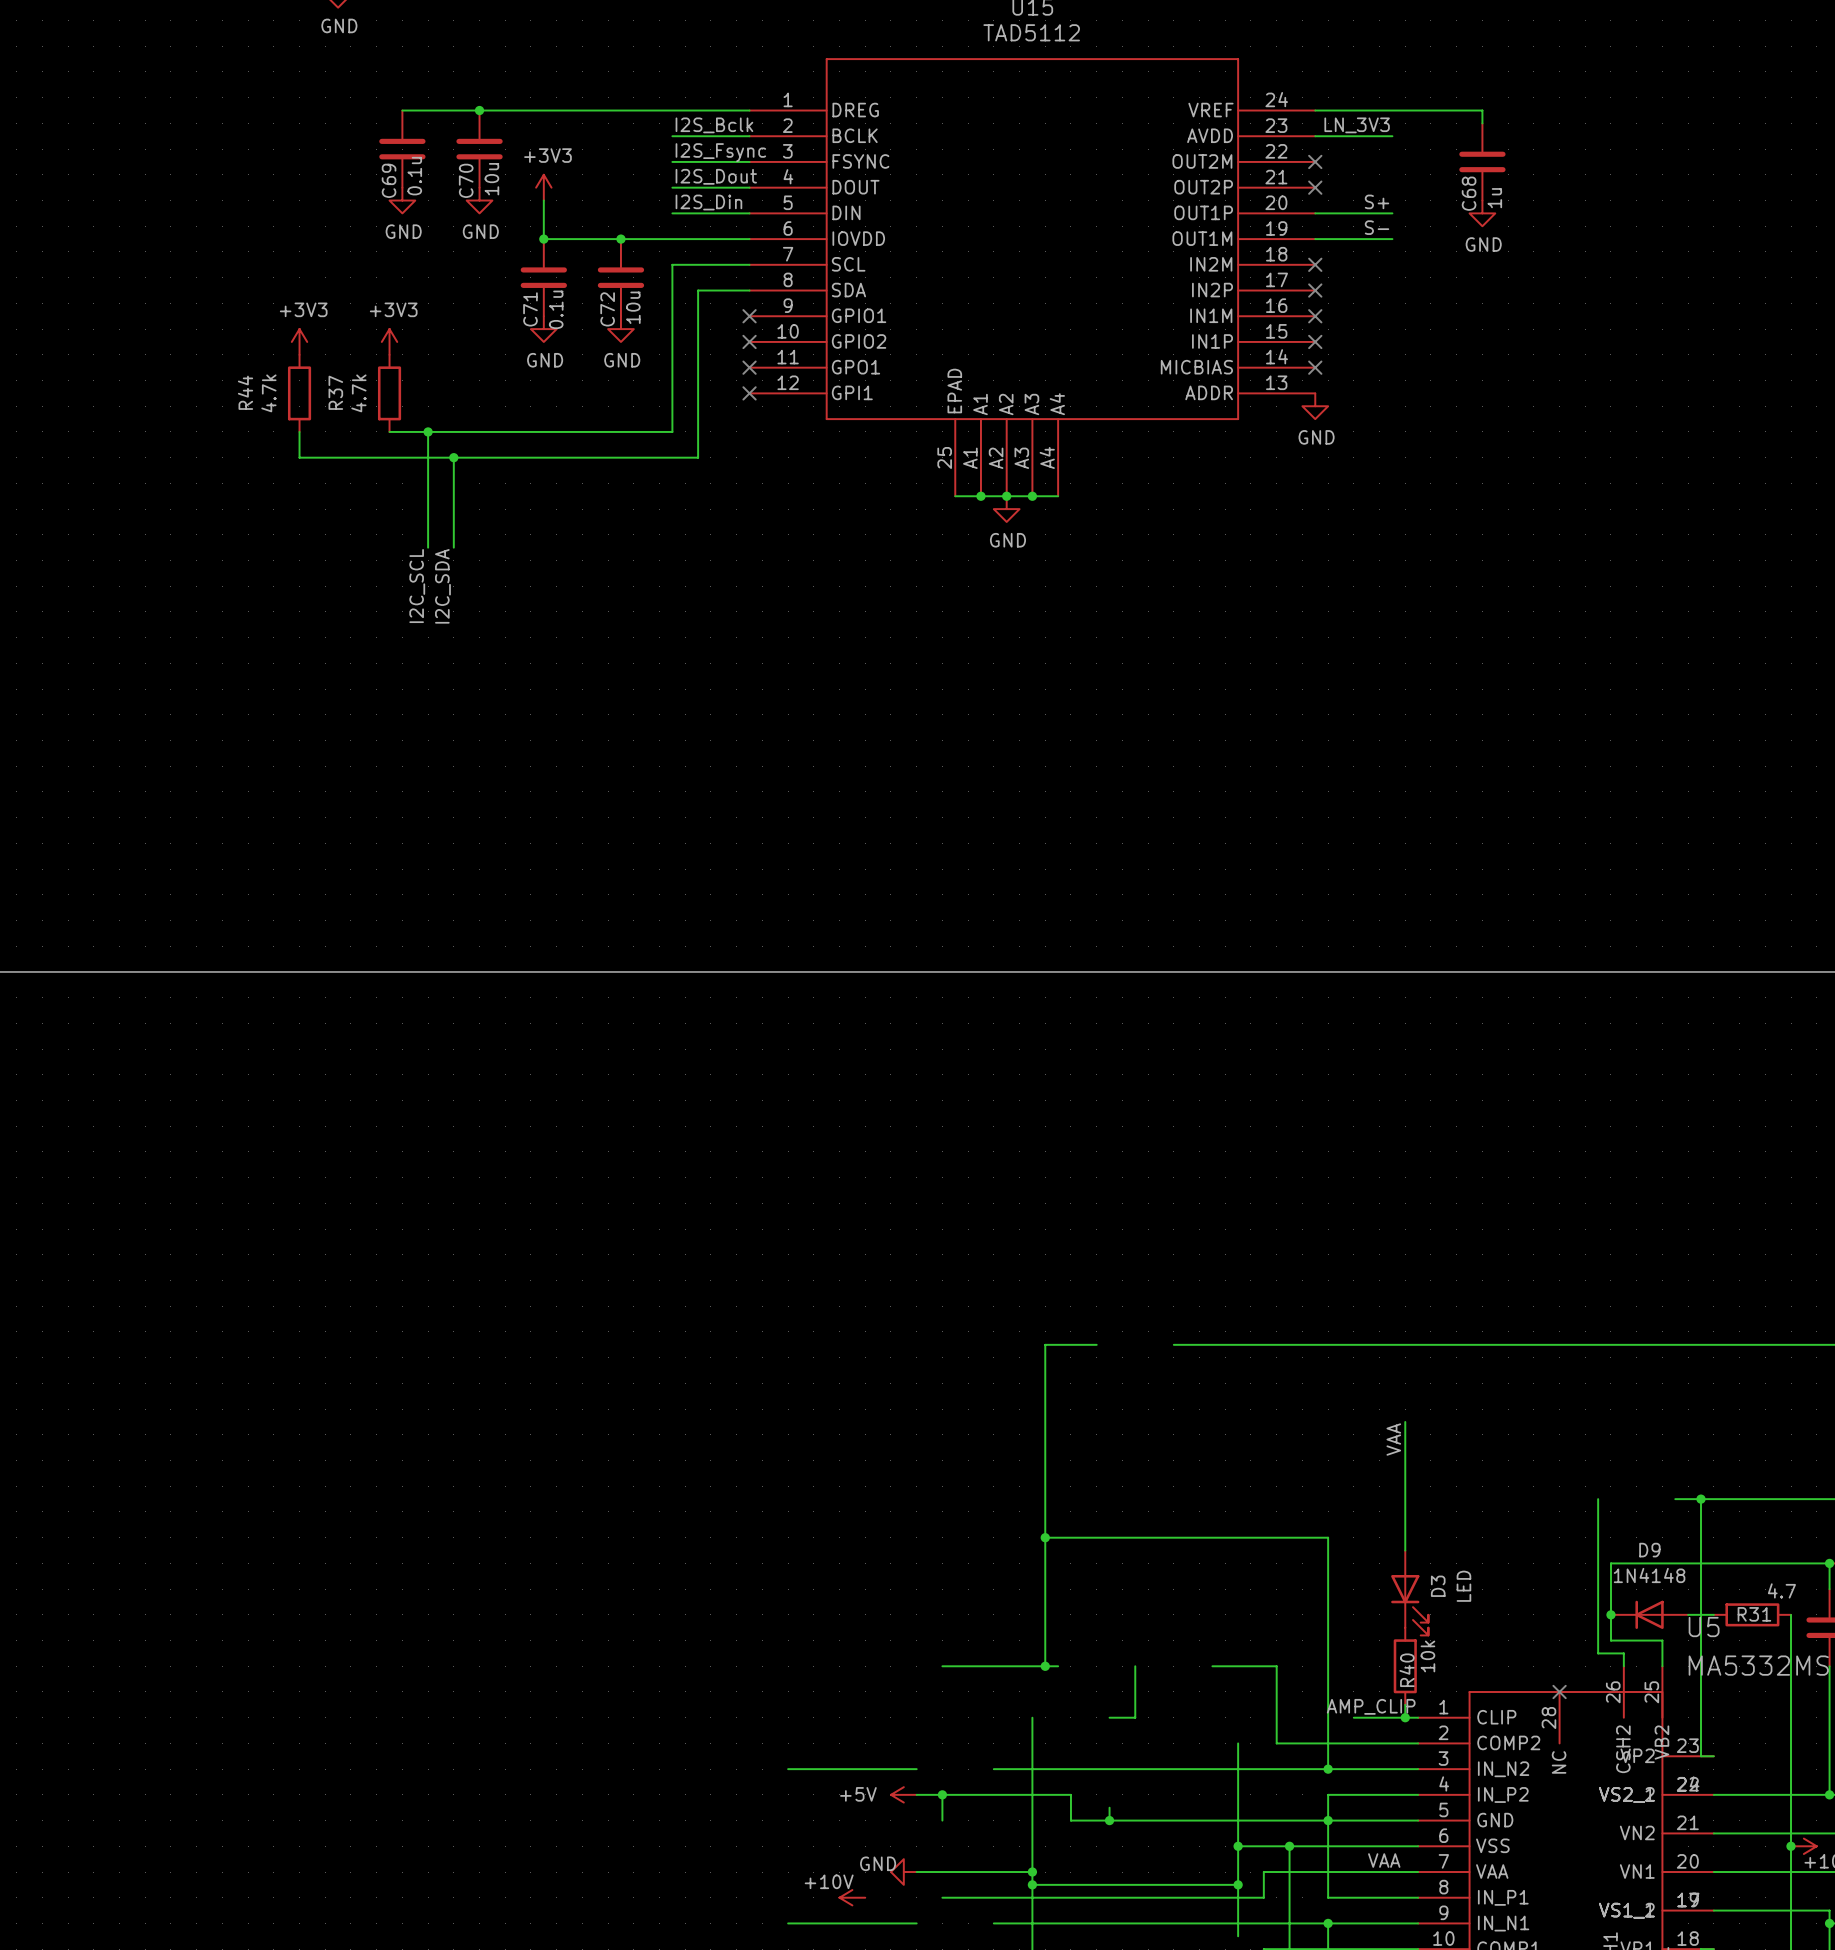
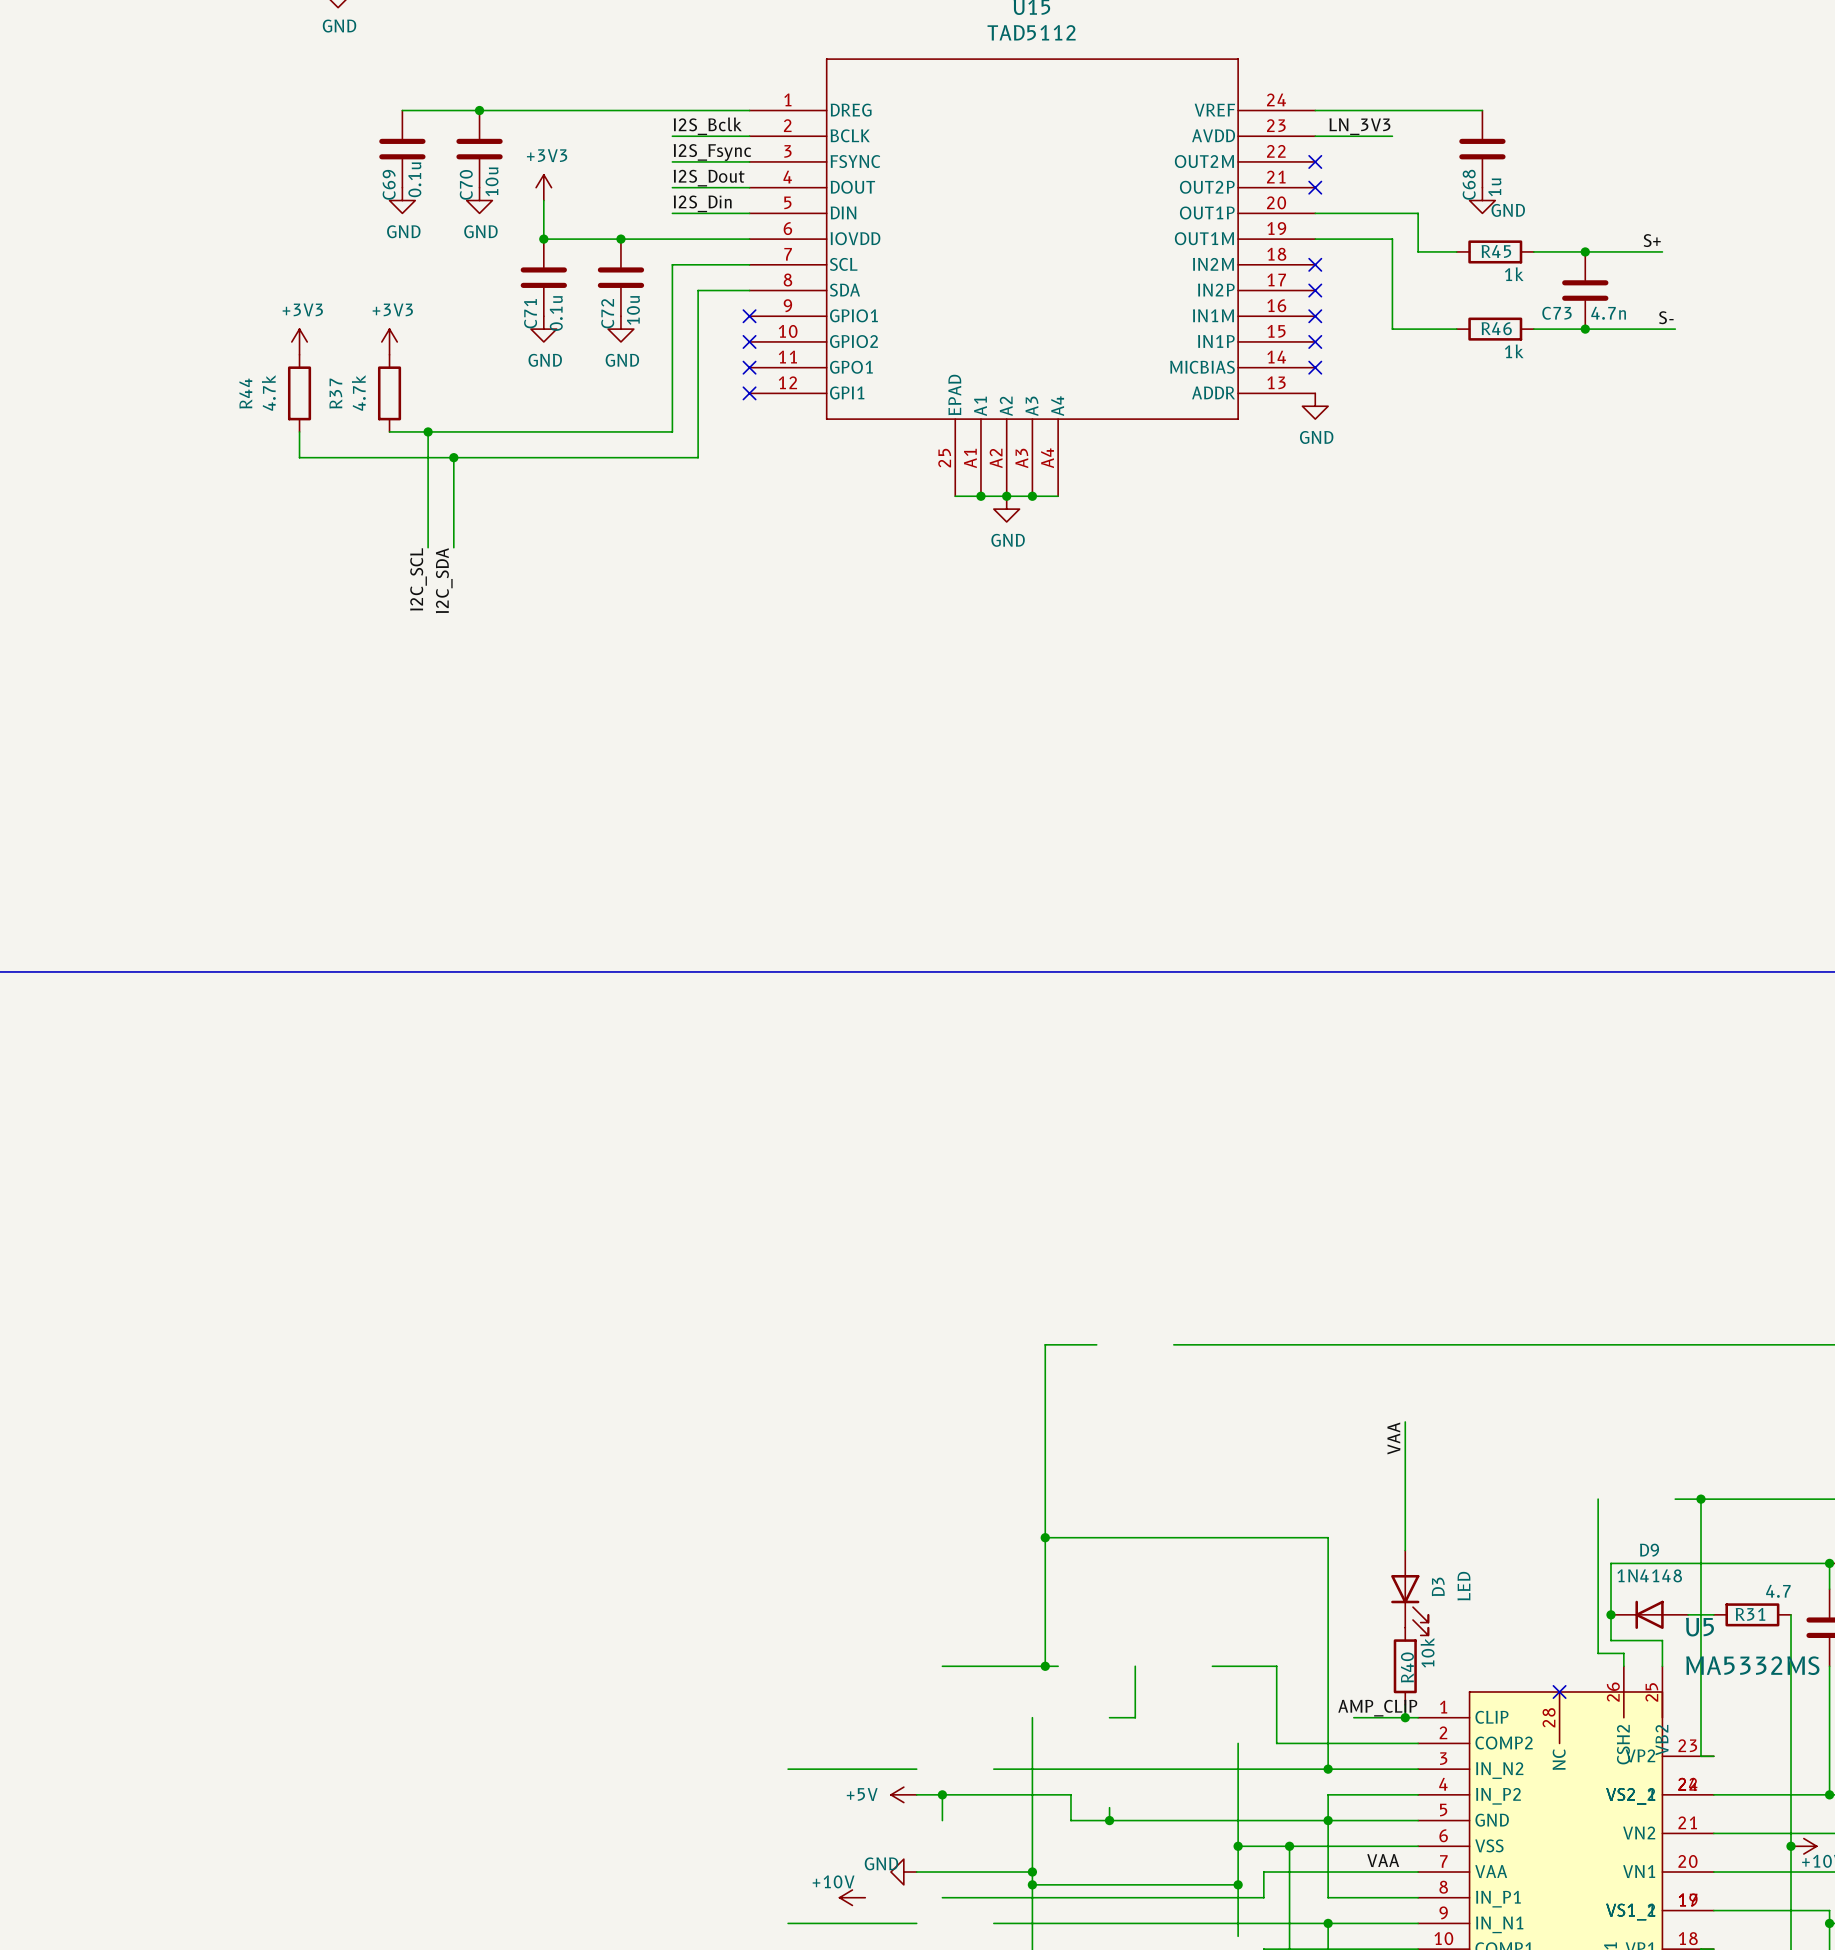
C68 position: (1482, 161) -> (1482, 149)
label: S+ (1377, 201) -> none
wire: none -> (1392, 213) (1418, 213) (1418, 251) (1456, 251)
power symbol position: GND (1482, 213) -> GND (1482, 200)
label: S- (1377, 227) -> none
wire: none -> (1392, 239) (1392, 329) (1456, 329)
label: none -> S+ (1652, 240)
power symbol text position: GND (1483, 244) -> GND (1508, 210)
R45: none -> 1k (1495, 251)
wire: none -> (1533, 251) (1662, 251)
junction: none -> (1585, 251)
C73: none -> 4.7n (1585, 290)
label: none -> S- (1666, 317)
R46: none -> 1k (1495, 329)
wire: none -> (1533, 329) (1675, 329)
junction: none -> (1585, 329)

